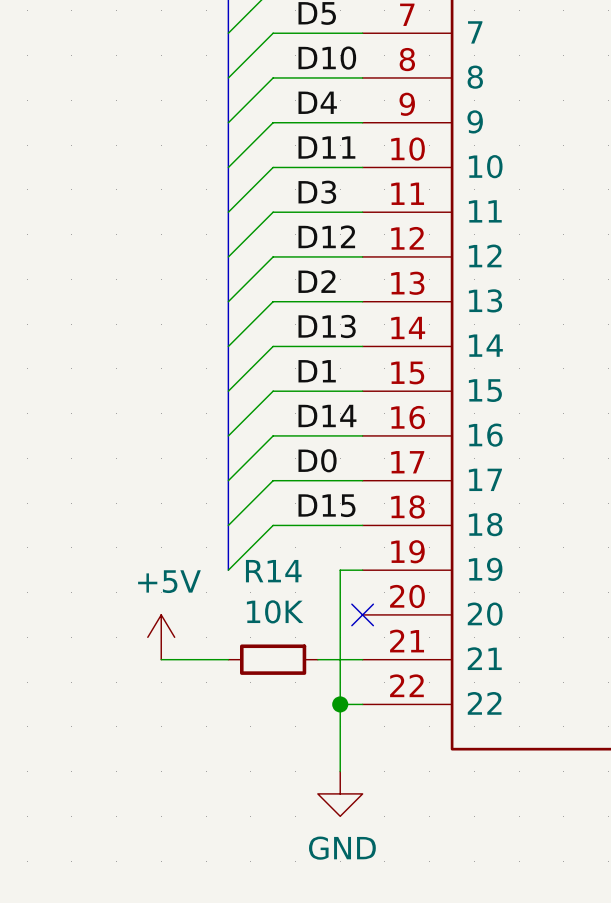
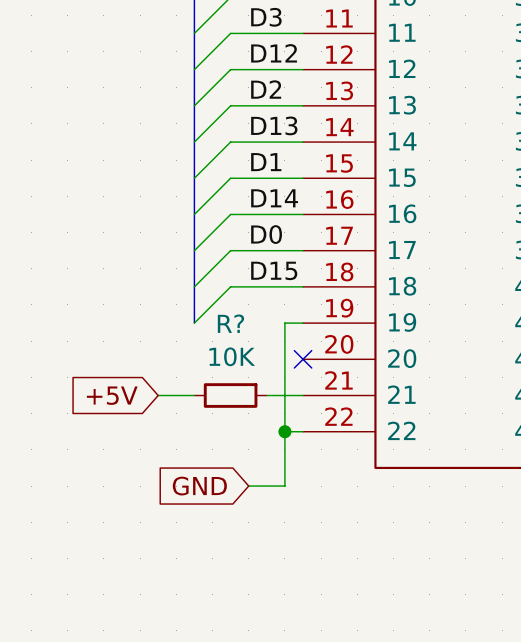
R14 name: R14 (273, 571) -> R? (230, 323)
power symbol: +5V (161, 637) -> none
global label: none -> +5V (112, 395)
wire: (161, 659) (183, 659) -> none
global label: none -> GND (199, 486)
wire: none -> (248, 486) (284, 486)
power symbol: GND (340, 793) -> none

